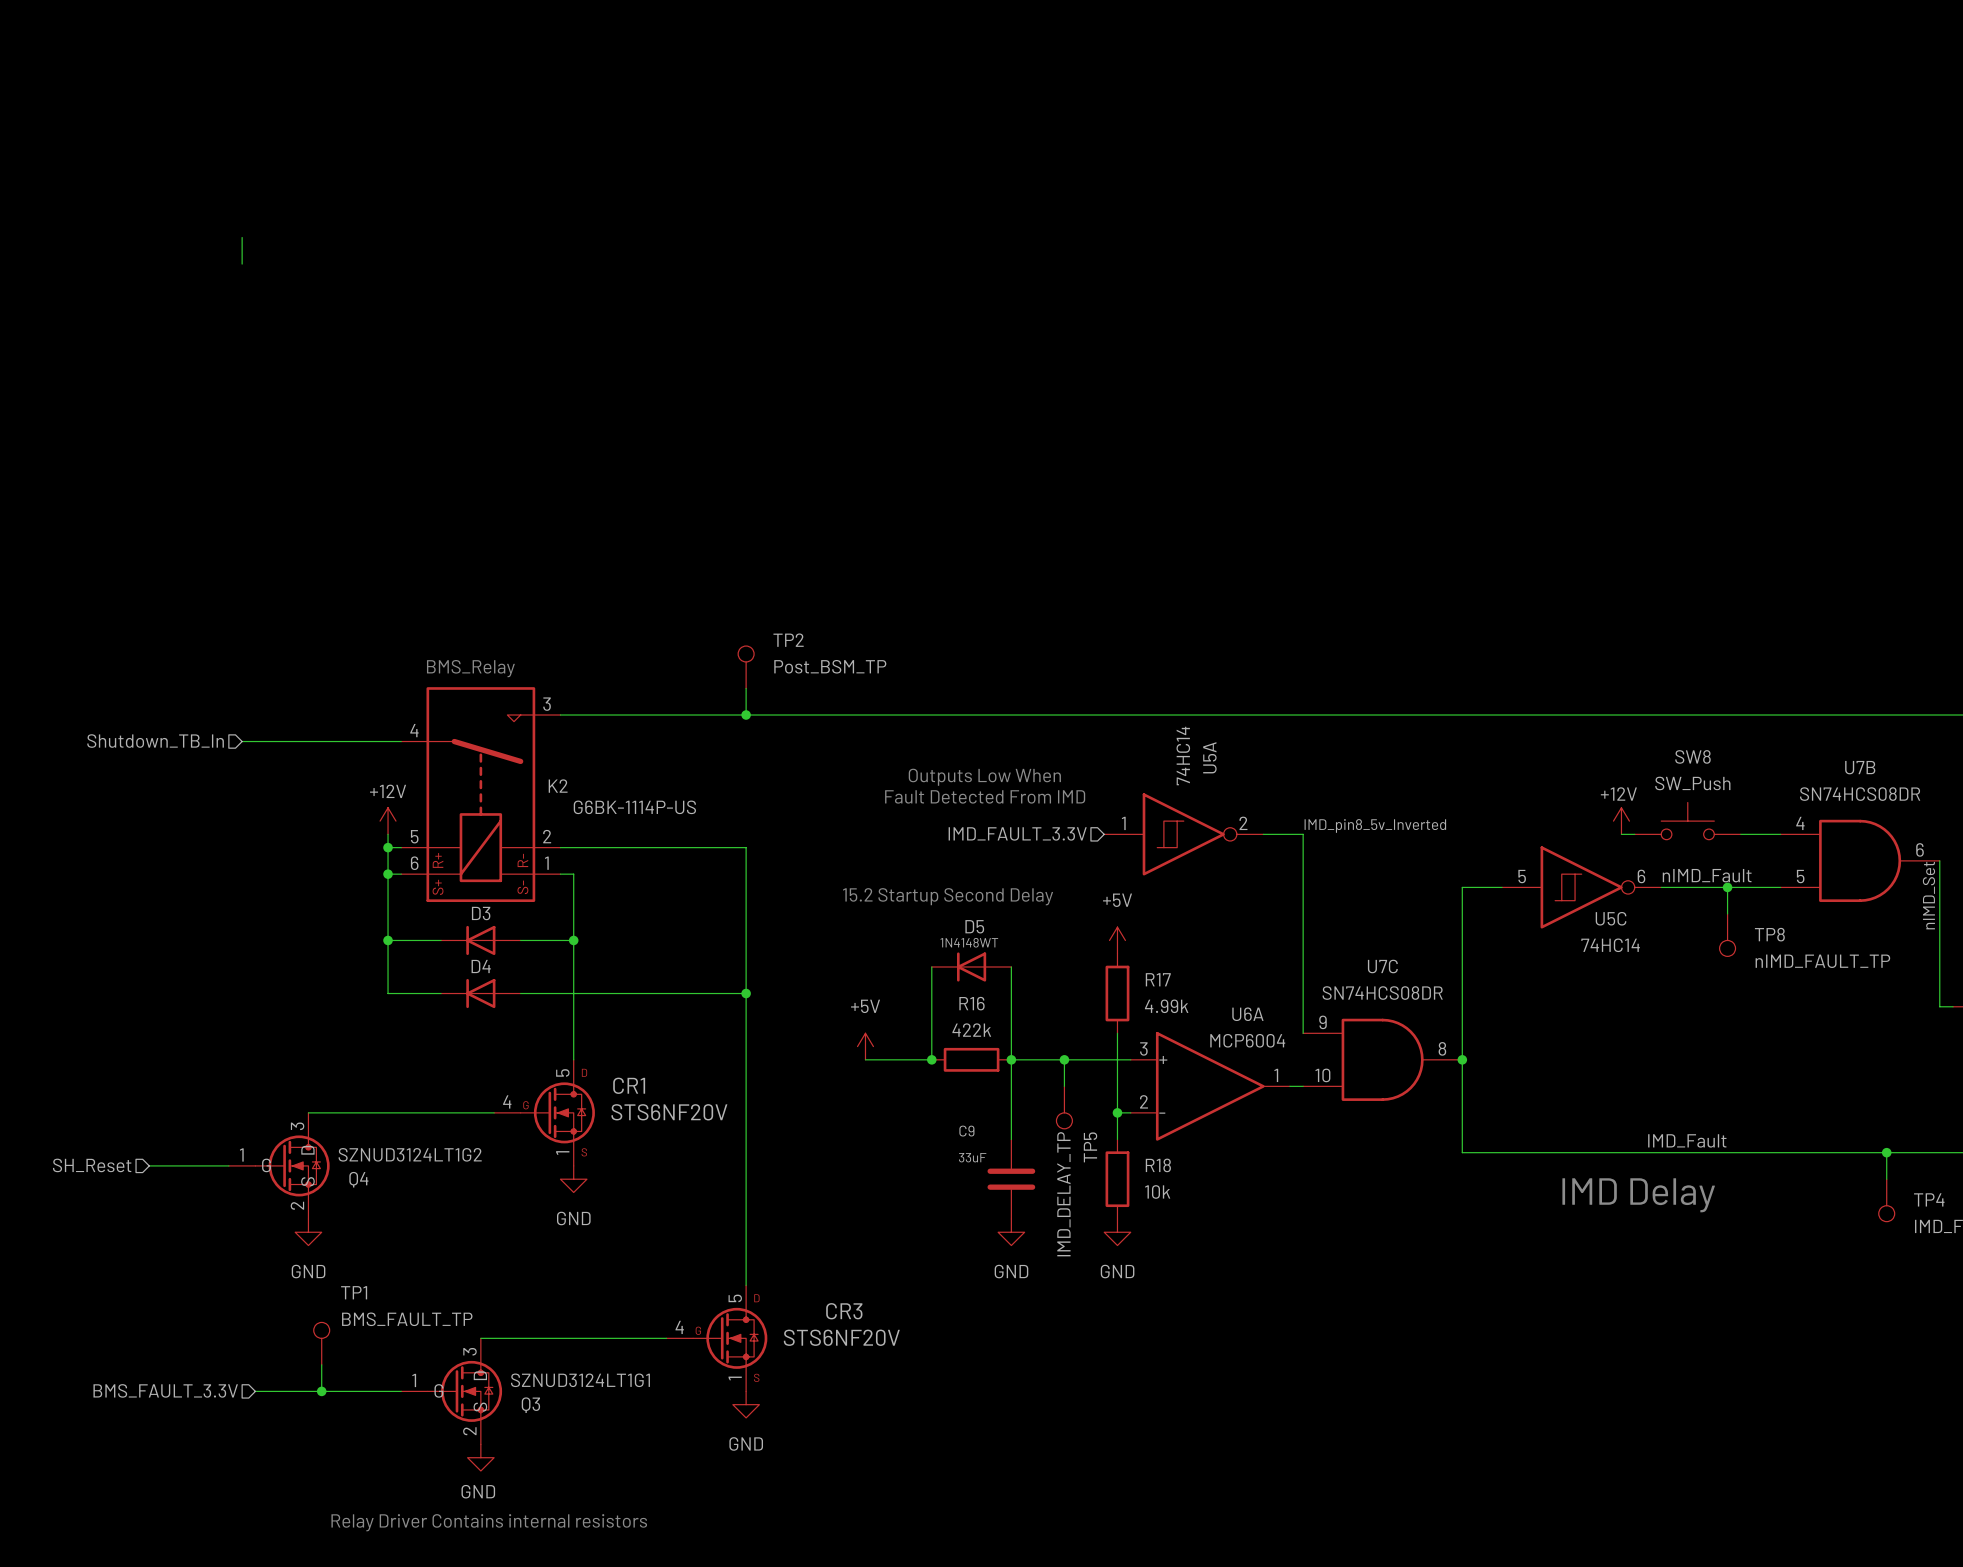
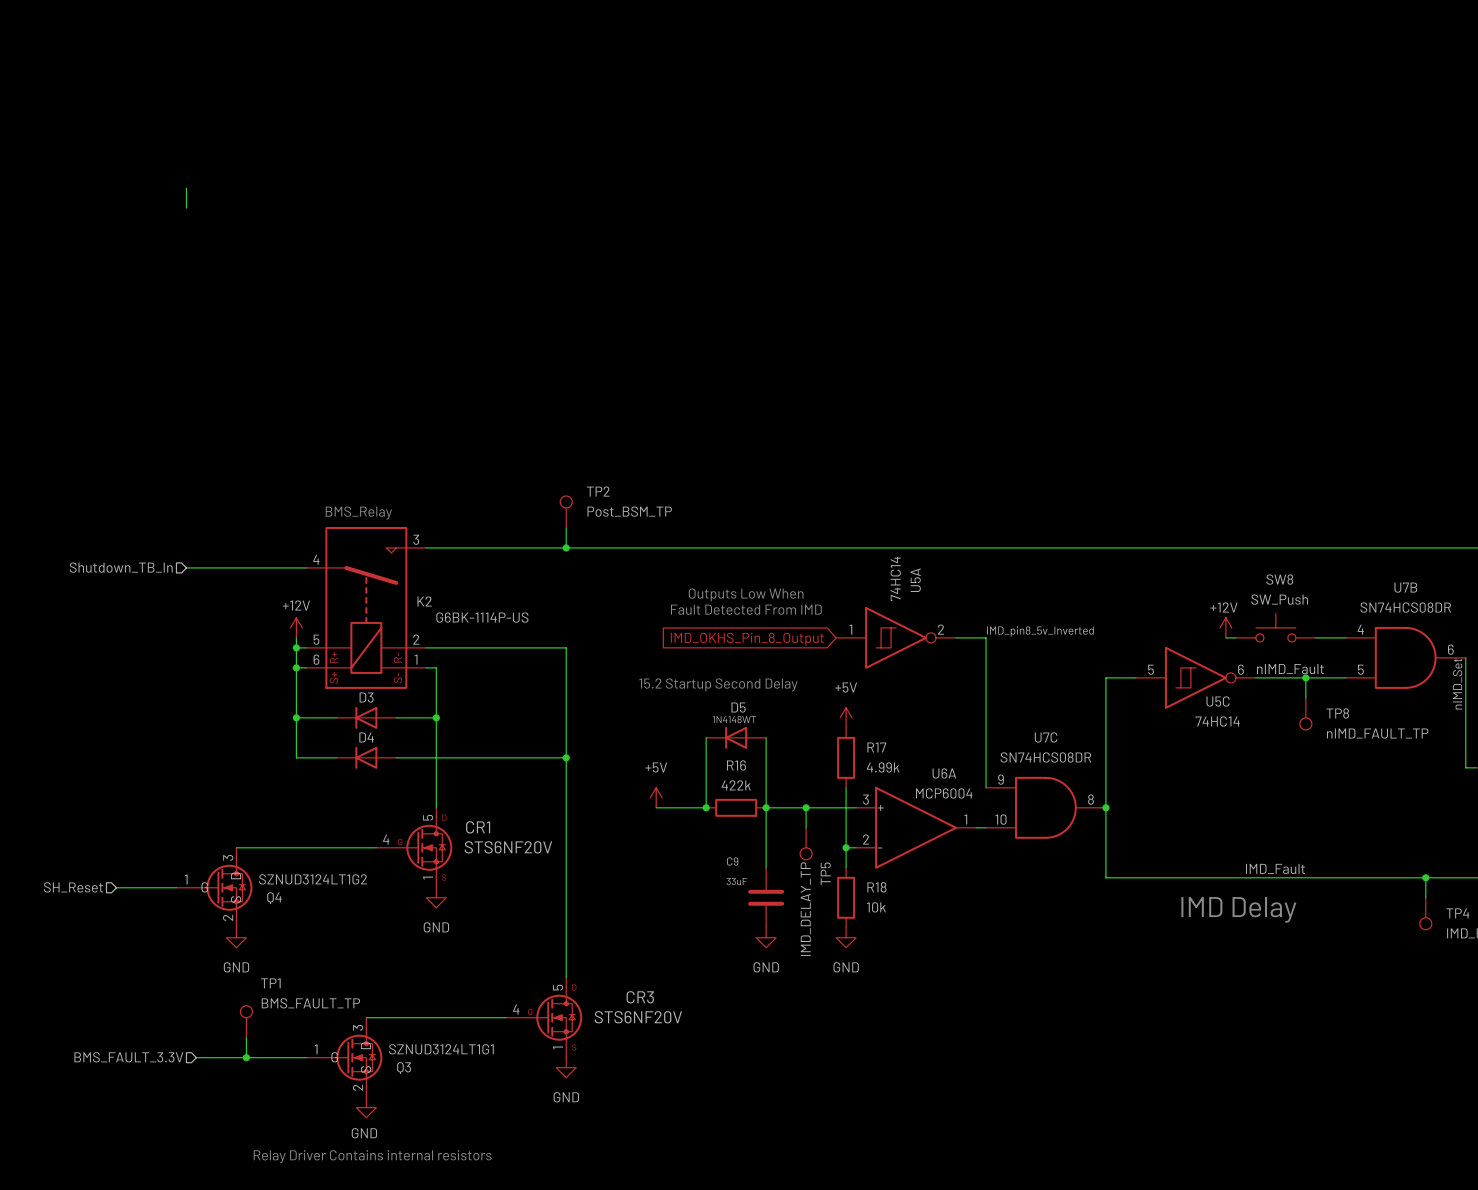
hierarchical label: IMD_FAULT_3.3V (1017, 833) -> none
global label: none -> IMD_OKHS_Pin_8_Output (747, 639)

